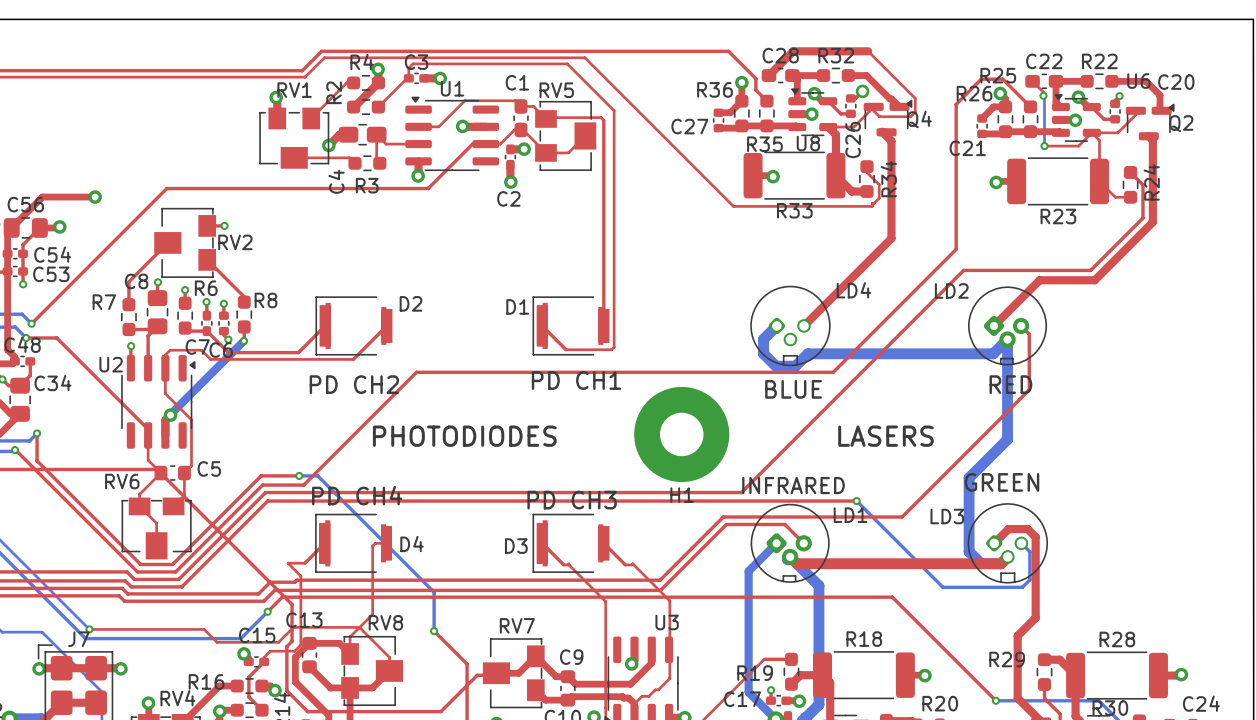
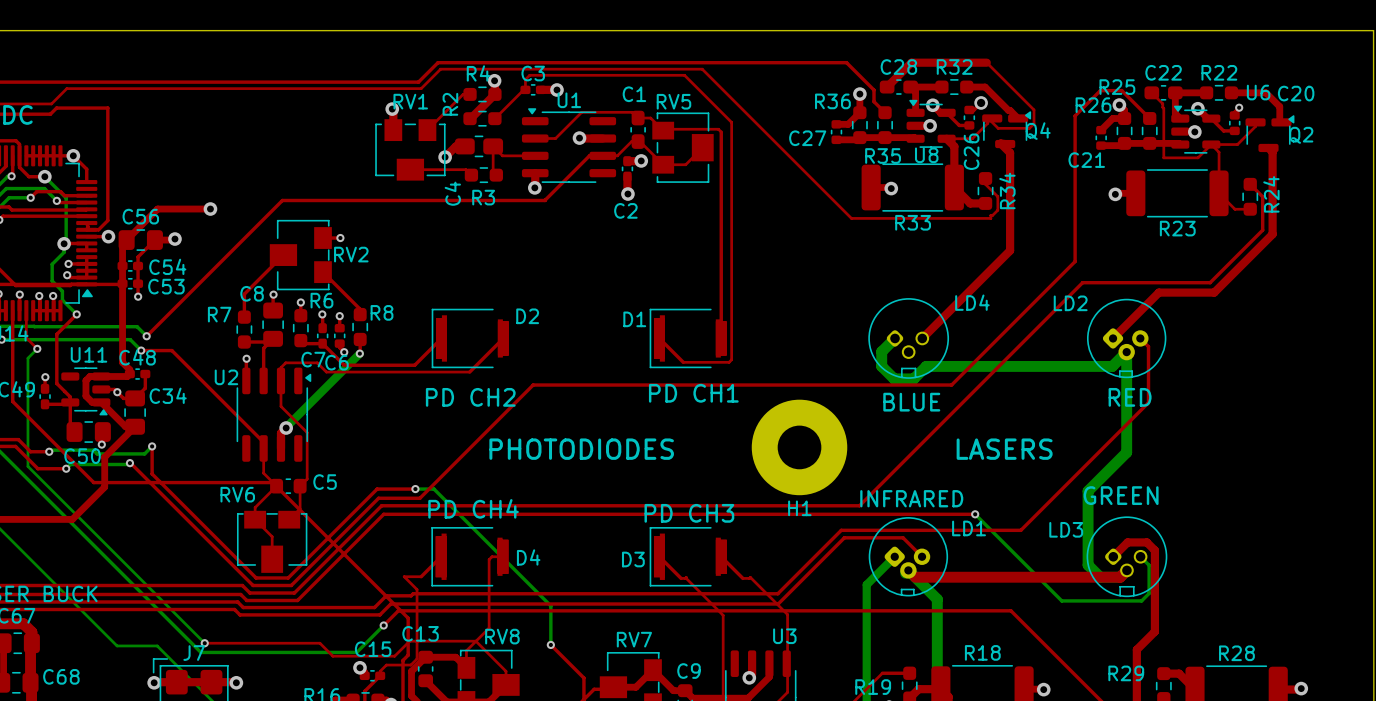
top track: none -> (1162, 107) (1163, 157)
bottom track: (1043, 95) (1044, 146) -> none
via: (1043, 95) -> none
via: (1044, 146) -> none

